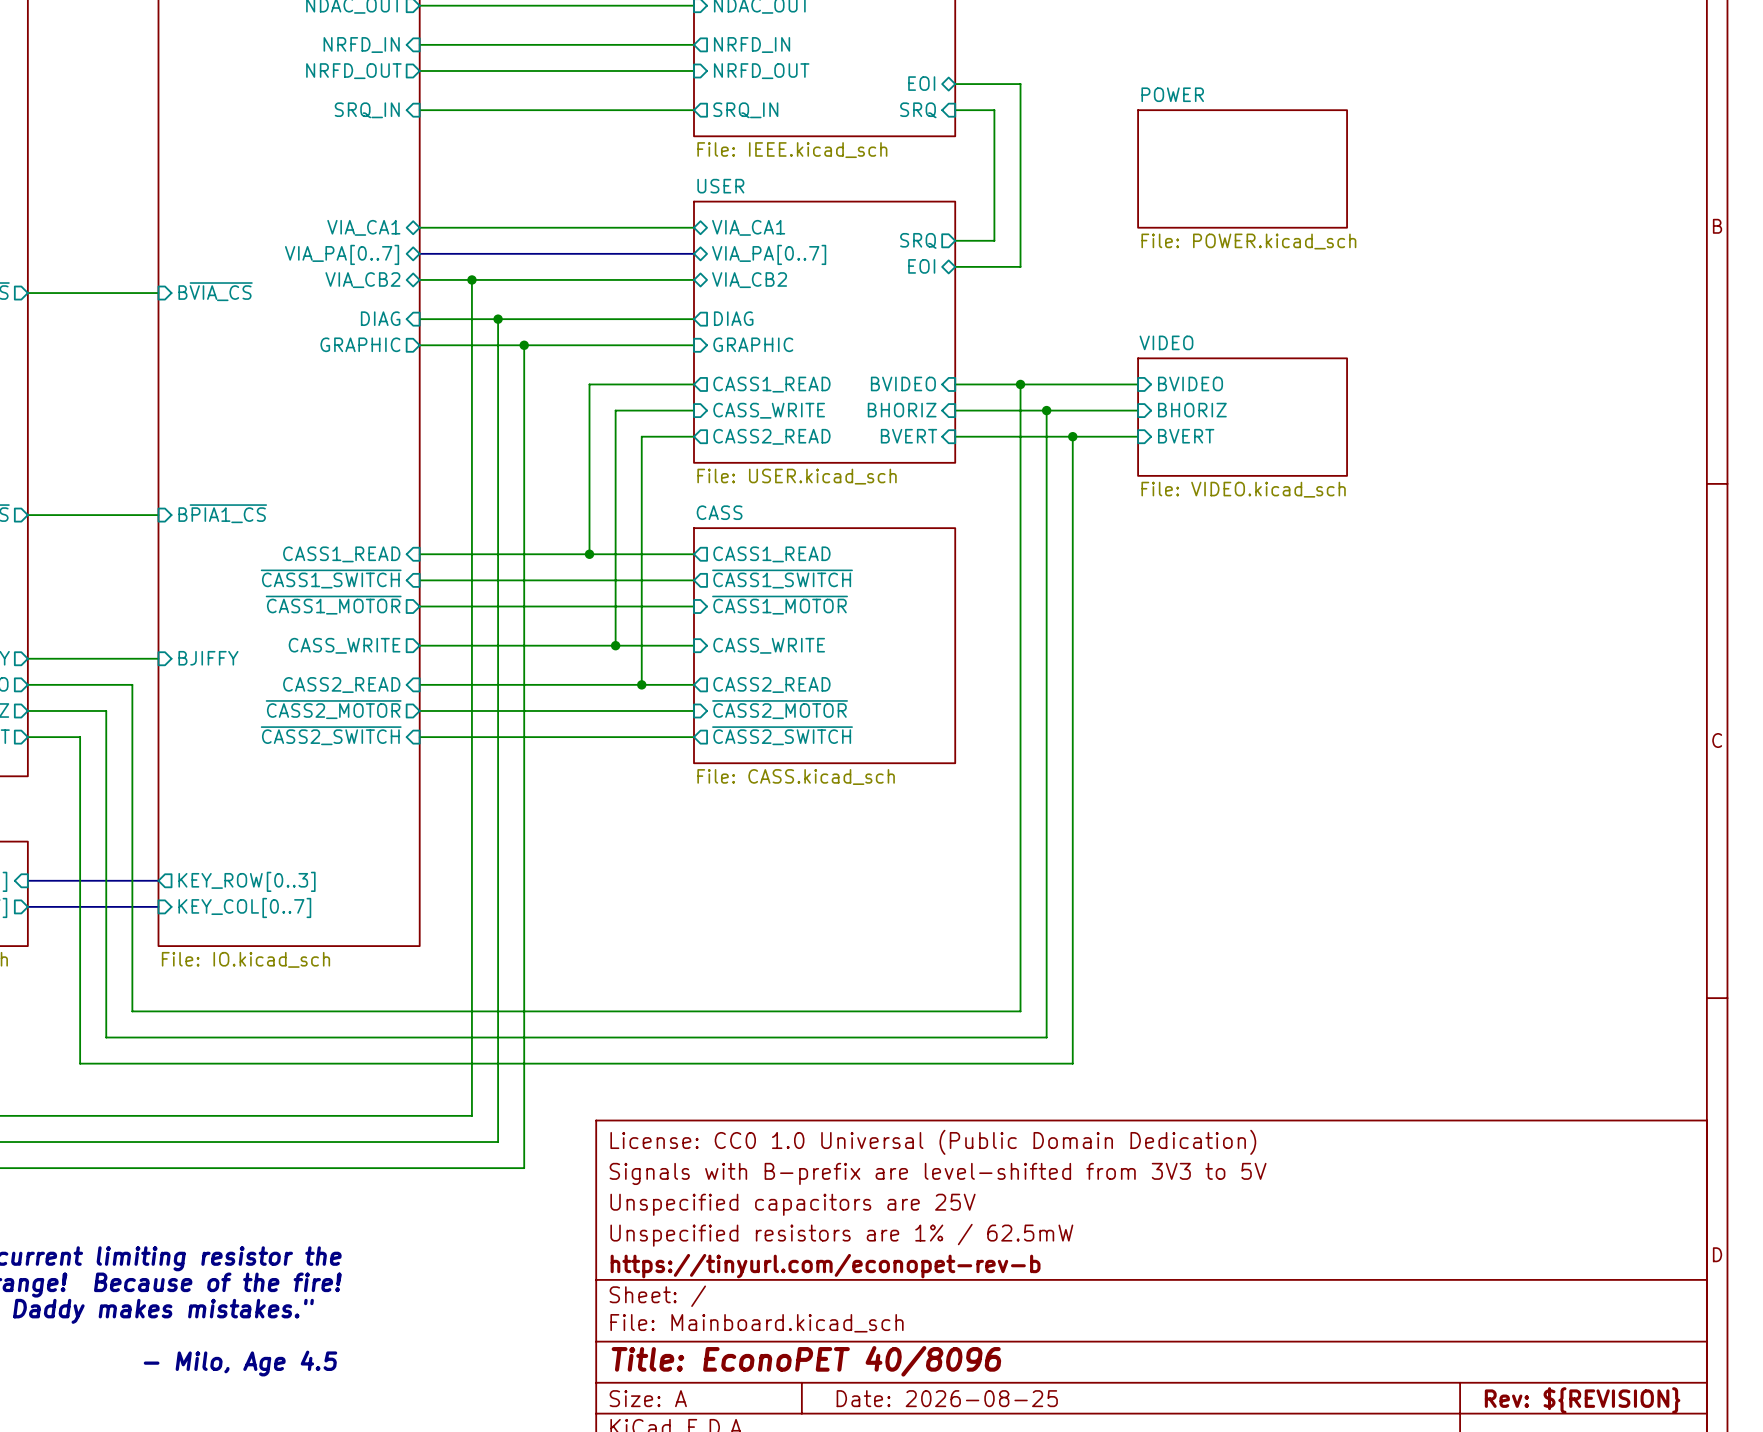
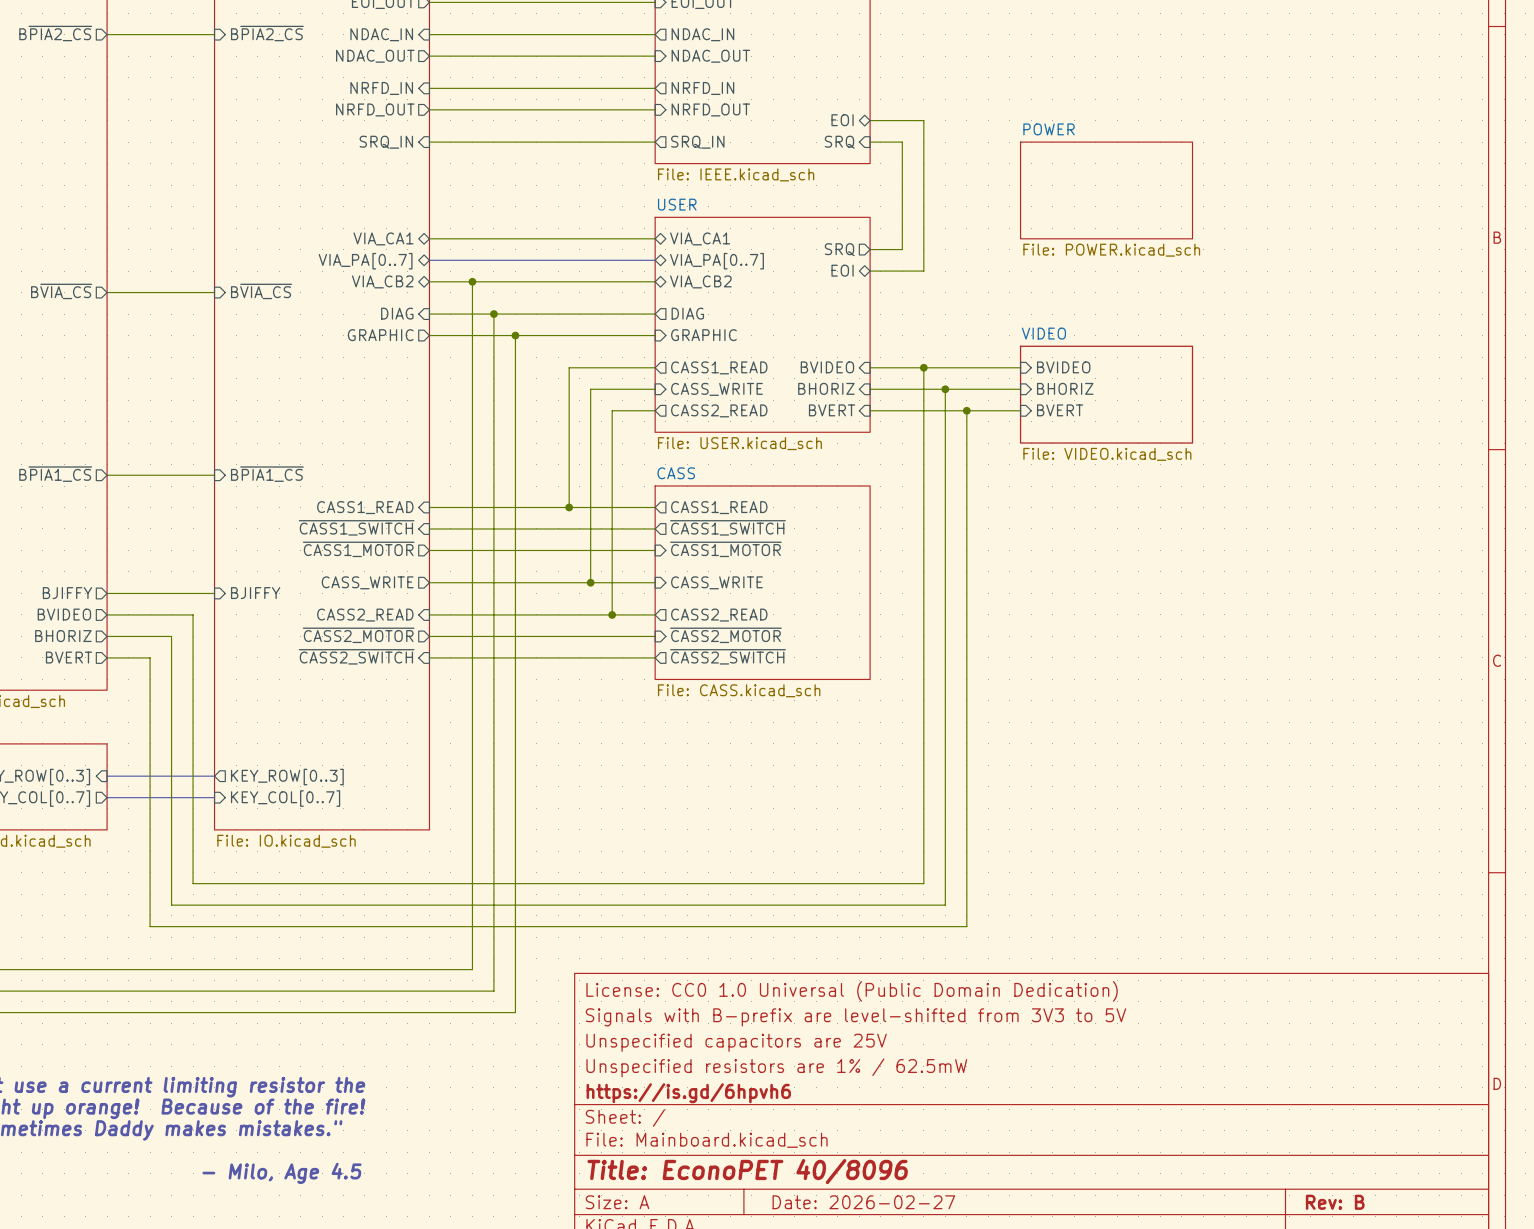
title block: https://tinyurl.com/econopet-rev-b (825, 1266) -> https://is.gd/6hpvh6 (688, 1093)
title block: Date: 2026-08-25 (947, 1398) -> Date: 2026-02-27 (863, 1202)
title block: Rev: ${REVISION} (1582, 1400) -> Rev: B (1335, 1202)

